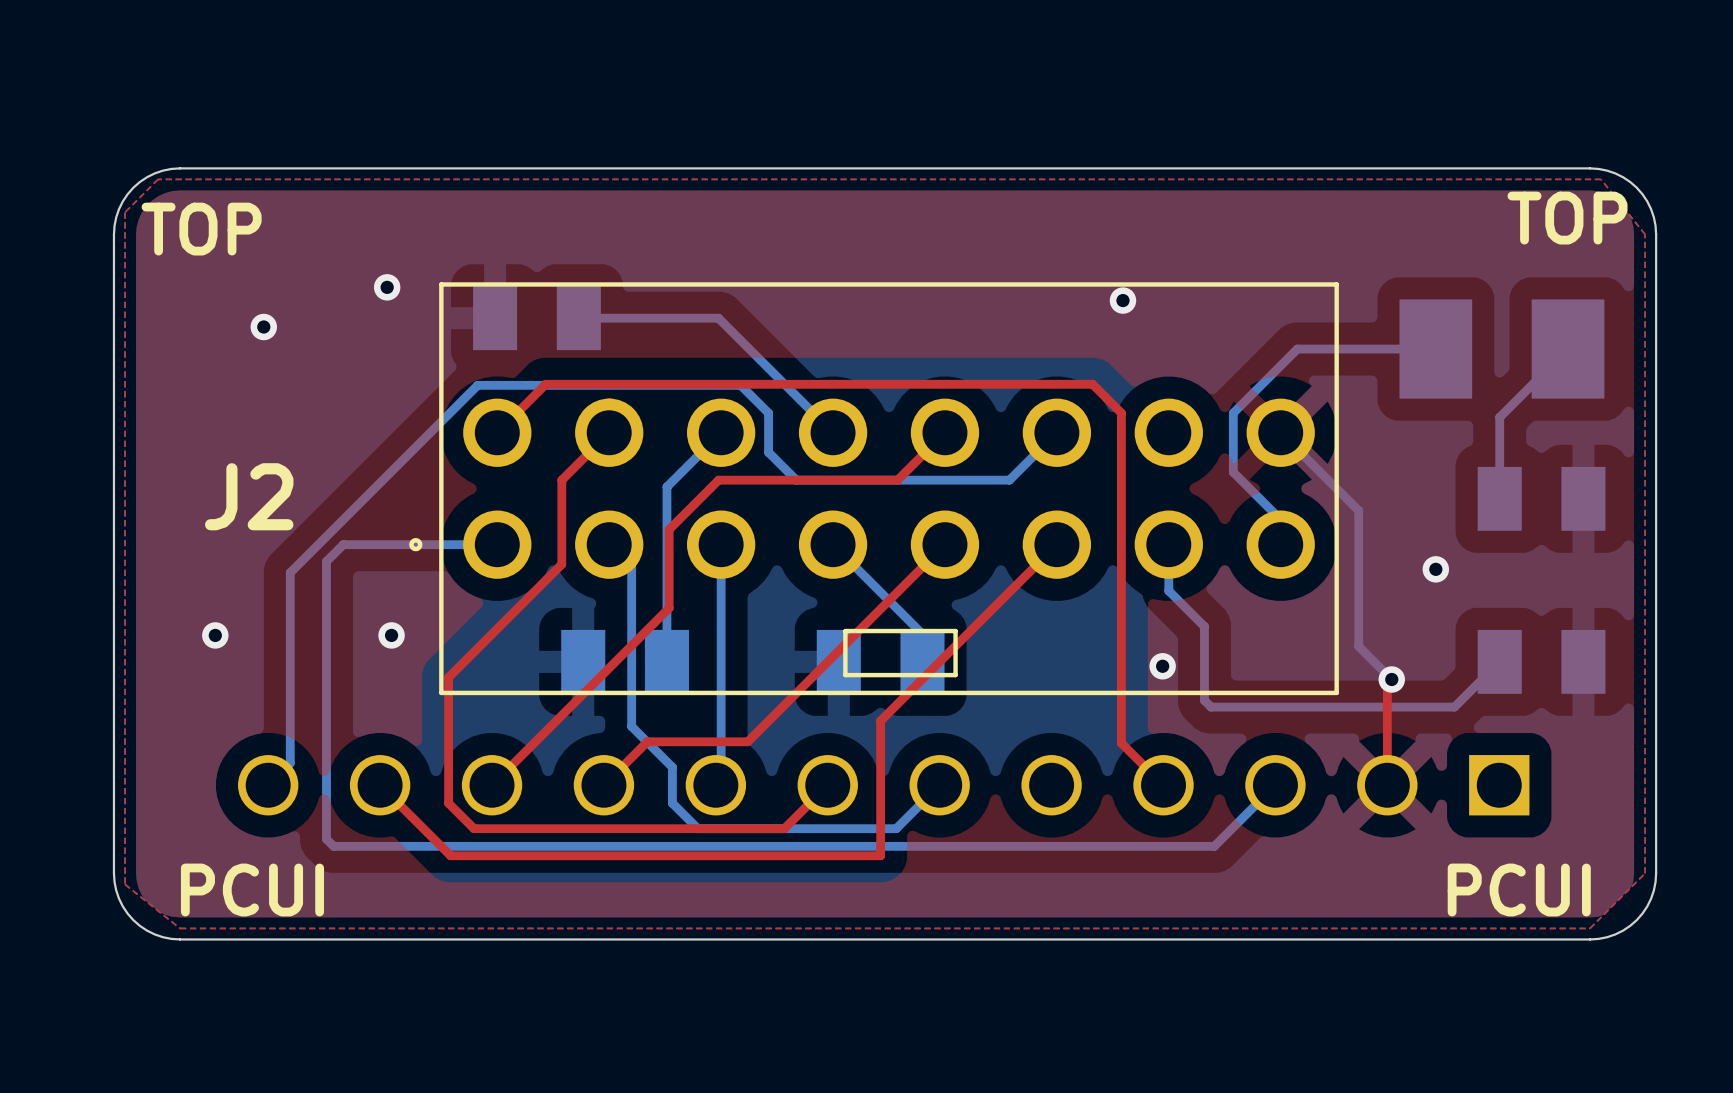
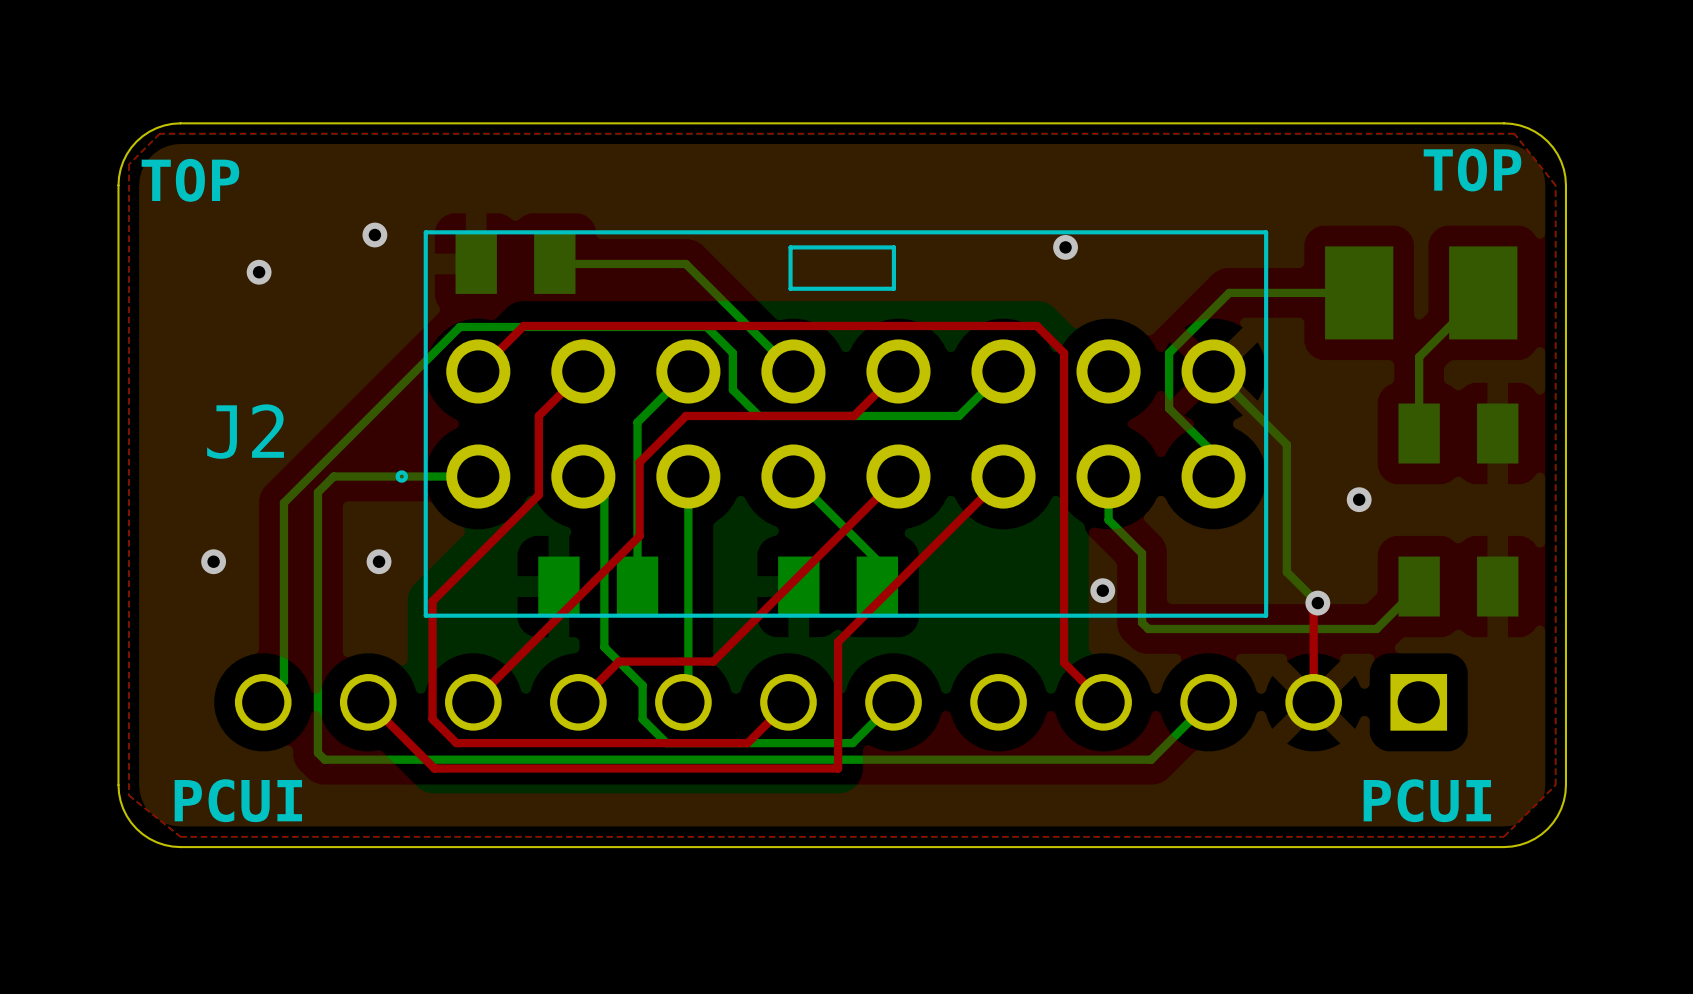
line: (845, 631) (955, 631) (955, 675) (845, 675) (845, 631) -> (790, 247) (893, 247) (893, 288) (790, 288) (790, 247)

